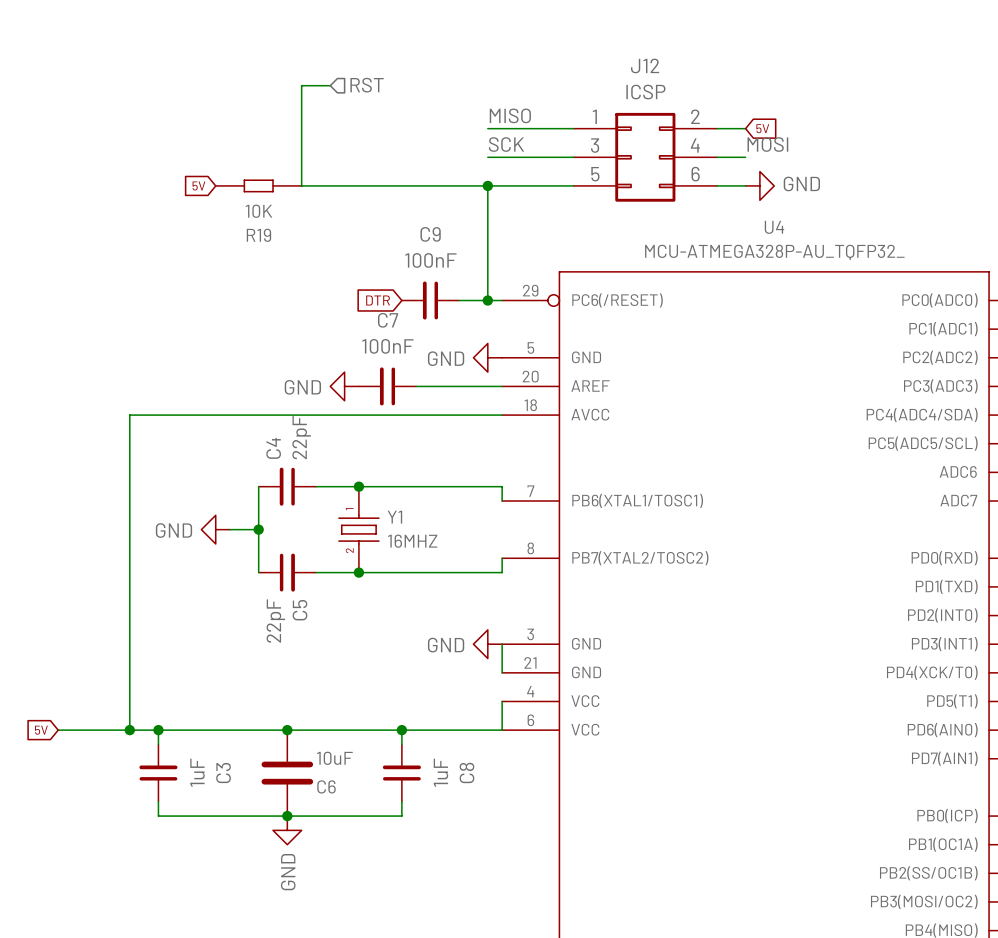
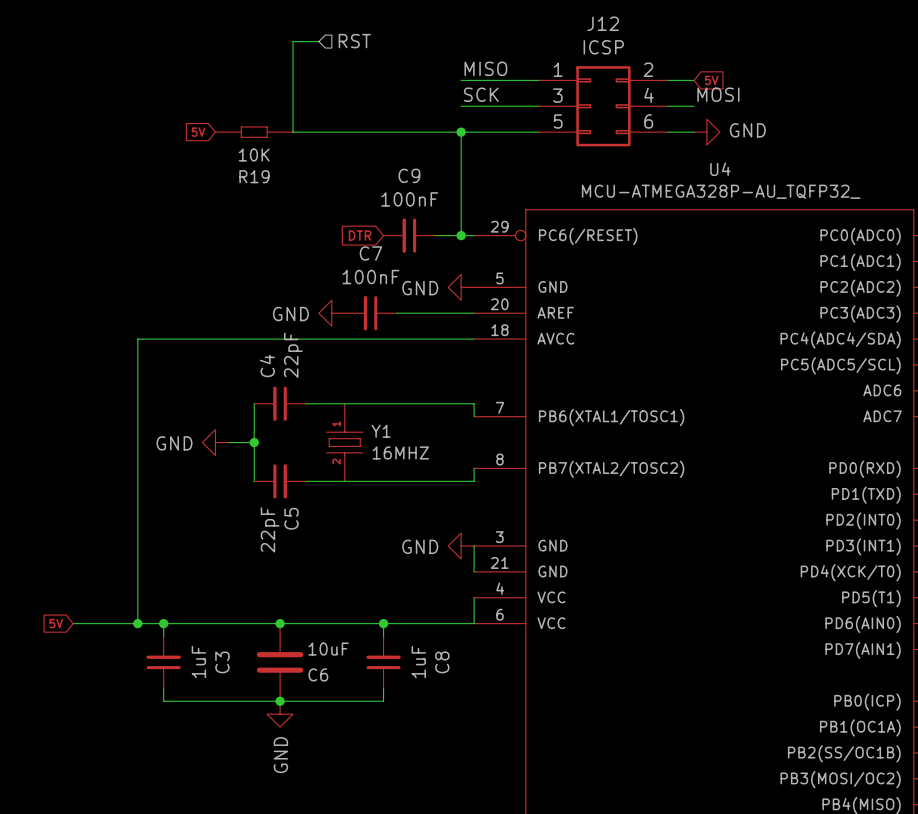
junction: (358, 486) -> none
junction: (358, 572) -> none

